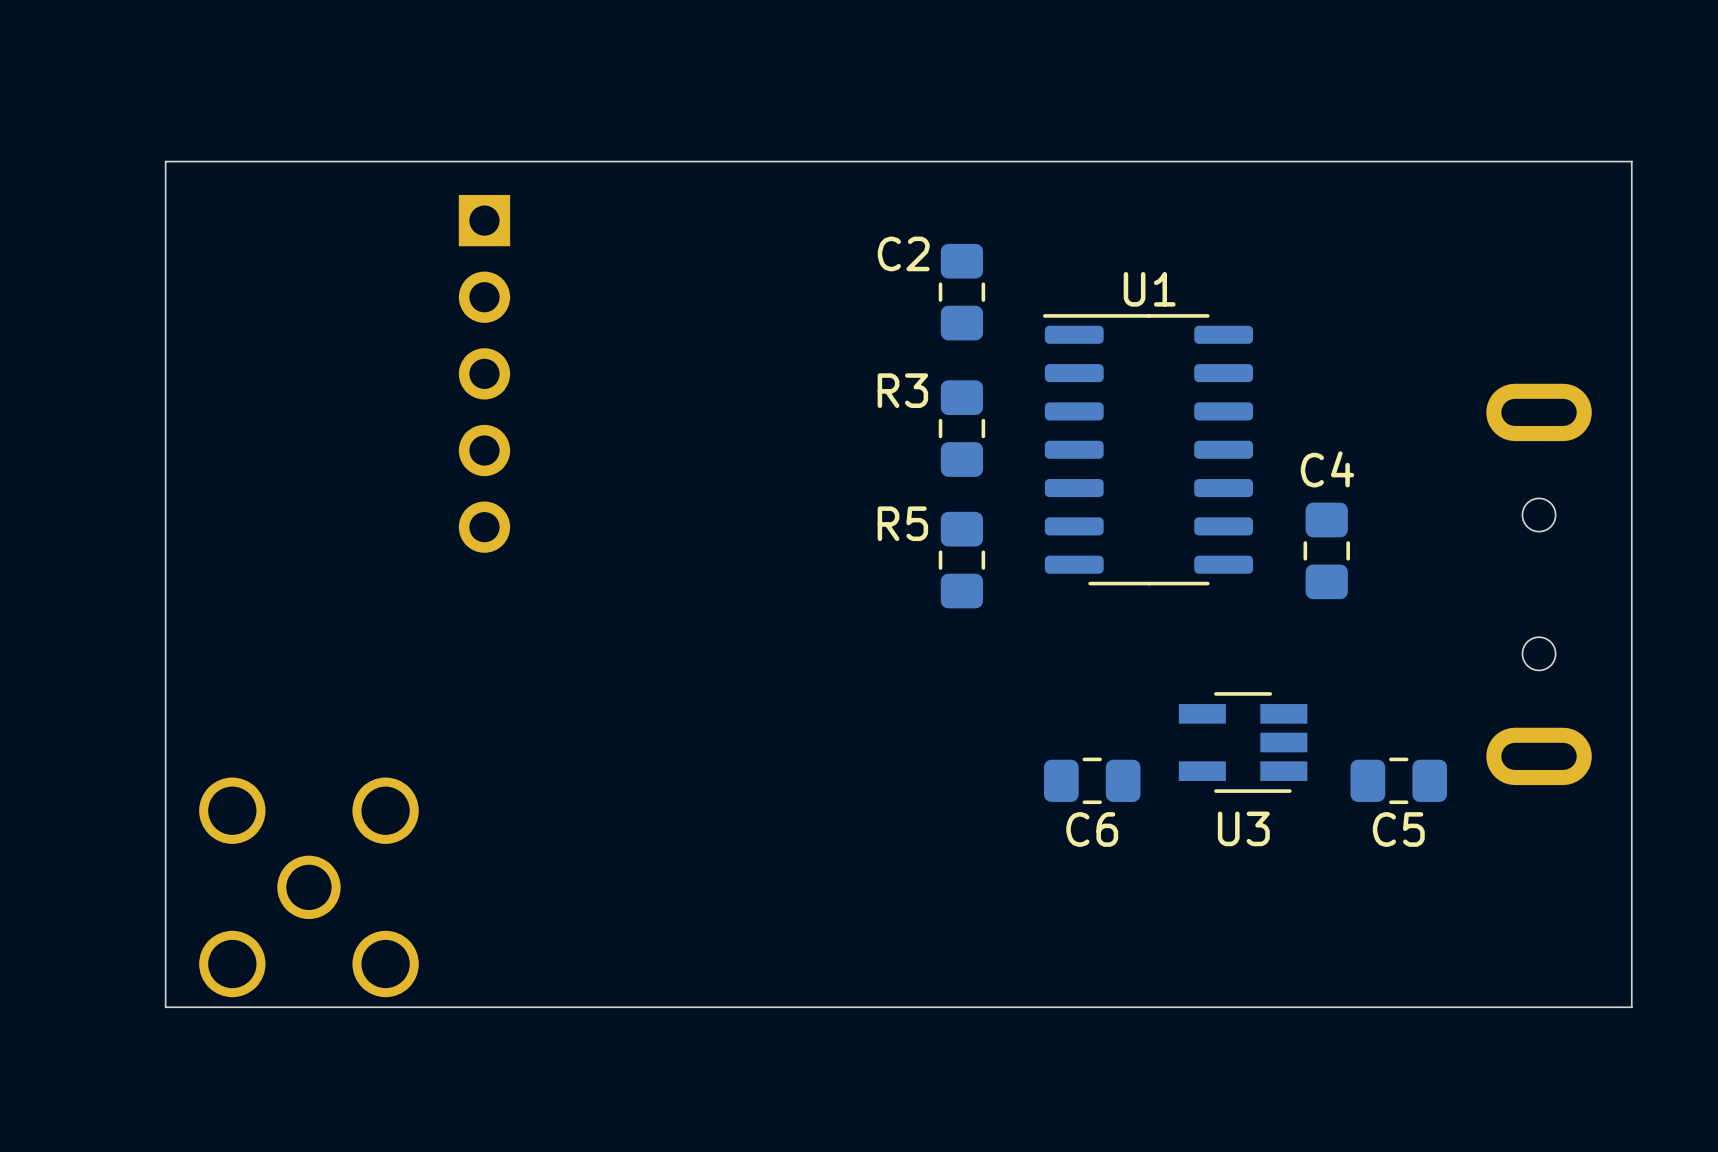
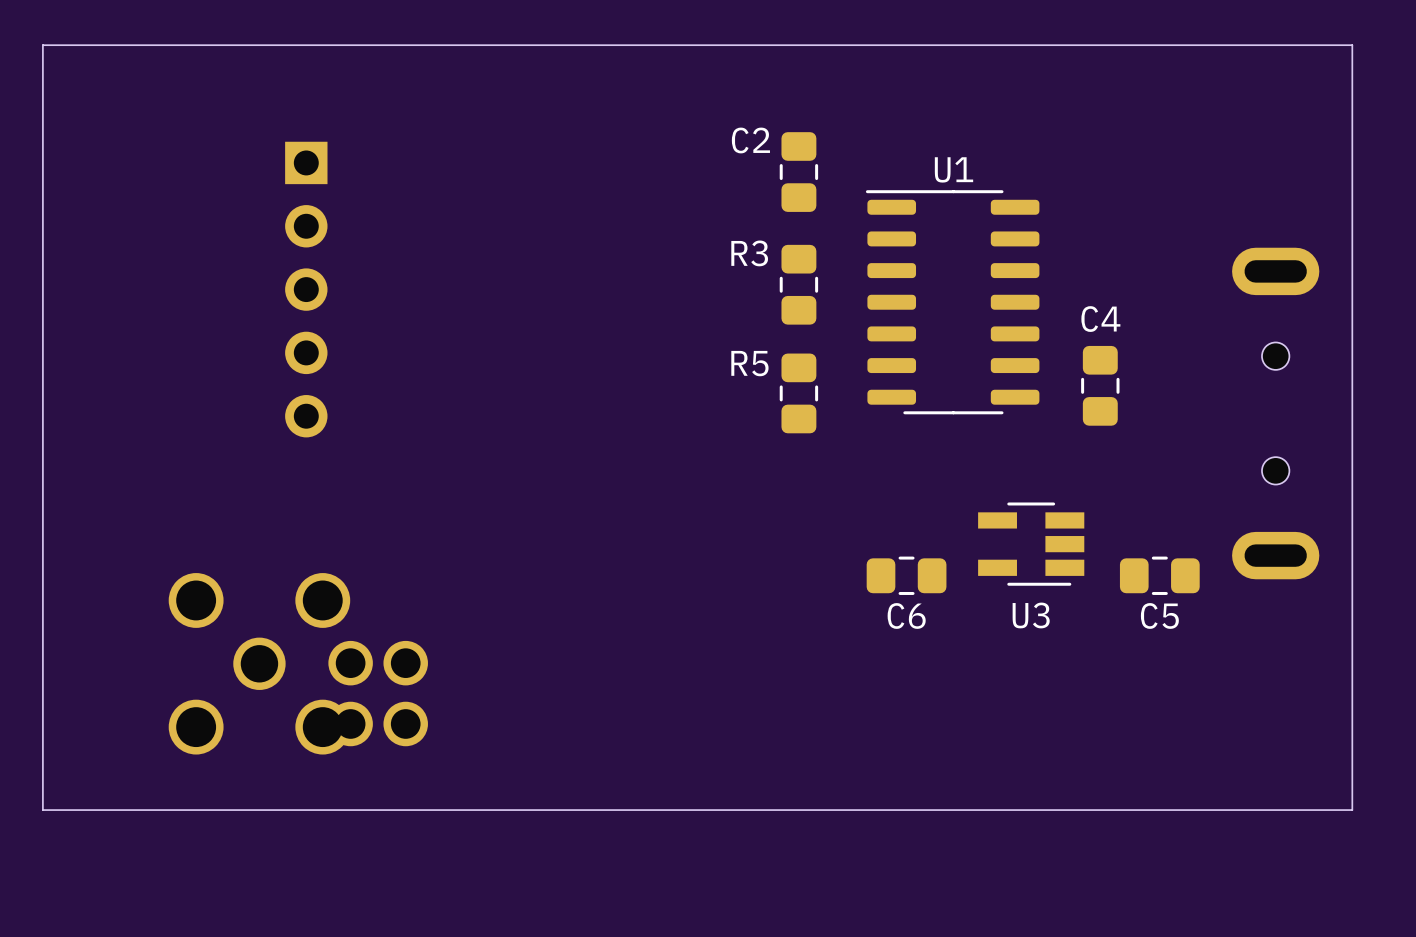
board edge: (1631, 161) (165, 161) (165, 1007) (1631, 1007) -> (1352, 64) (1352, 45) (42, 45) (42, 810) (1352, 810) (1352, 762)
part position: (484, 373) -> (306, 289)
part: none -> (378, 693)

